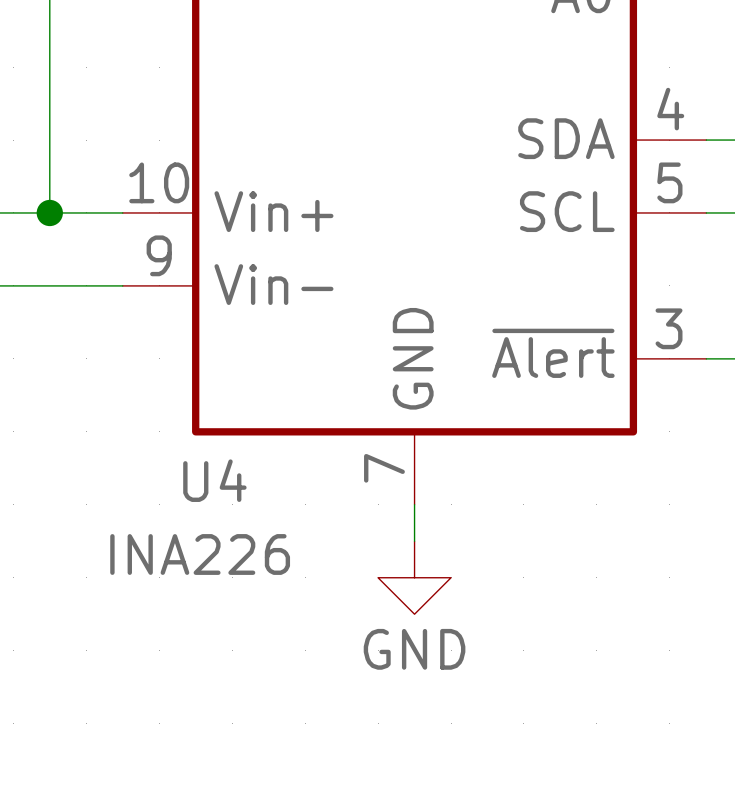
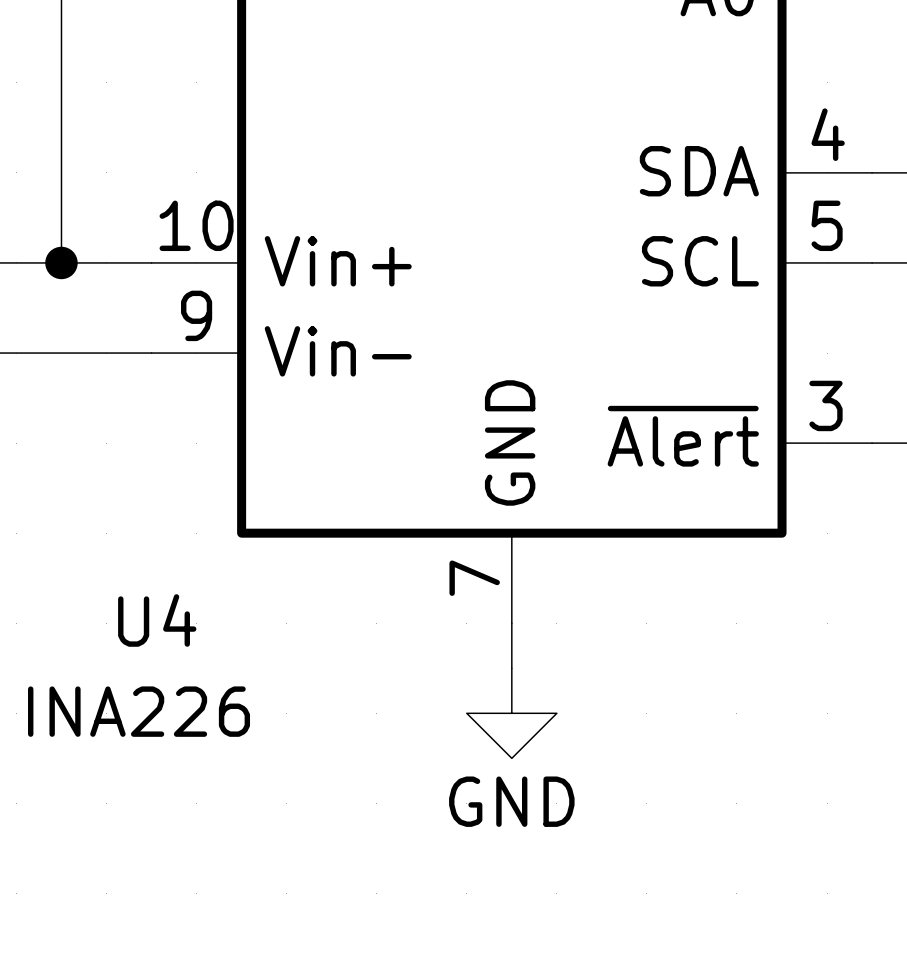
U4 name position: U4 (214, 480) -> U4 (157, 620)
U4 value position: INA226 (200, 554) -> INA226 (139, 711)

